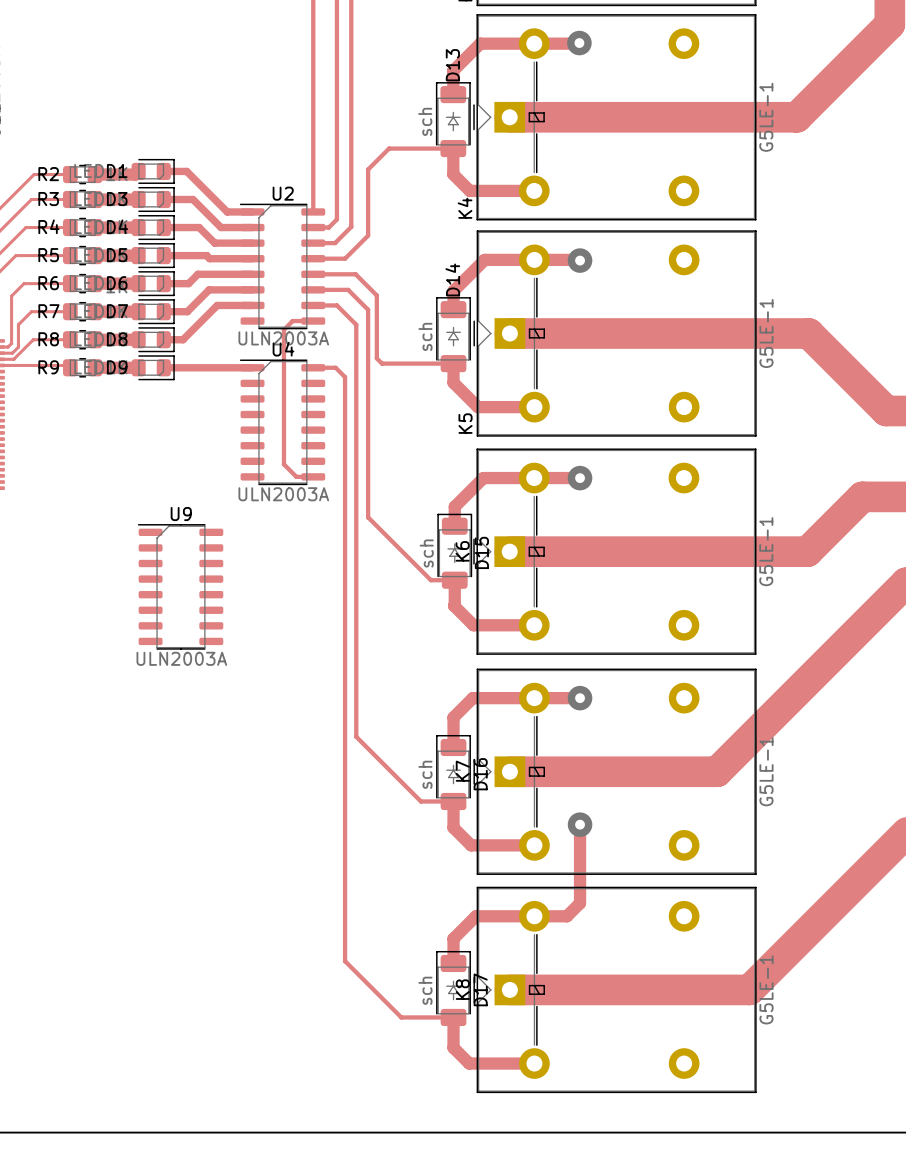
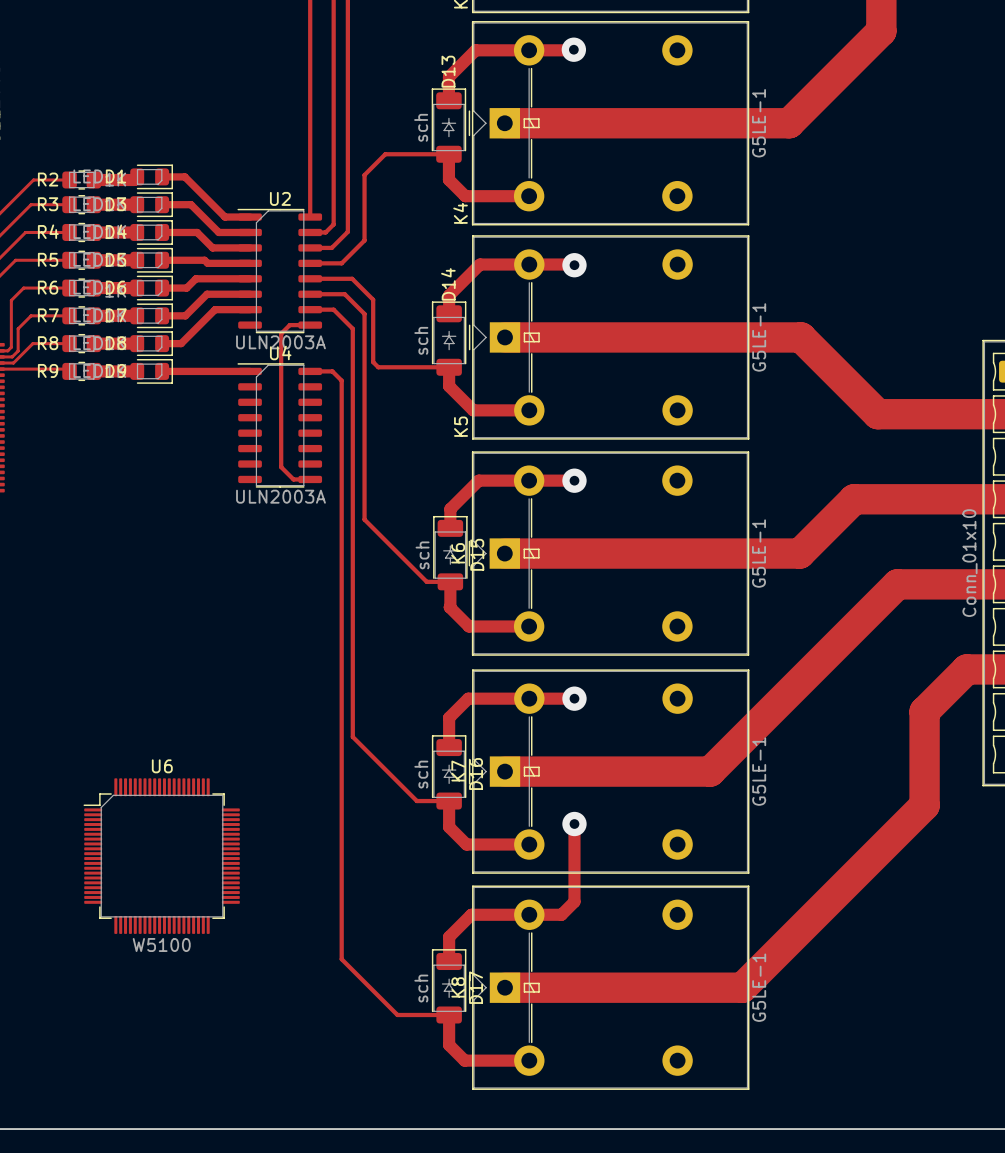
U9: ULN2003A (180, 586) -> none
U6: none -> W5100 (161, 856)

